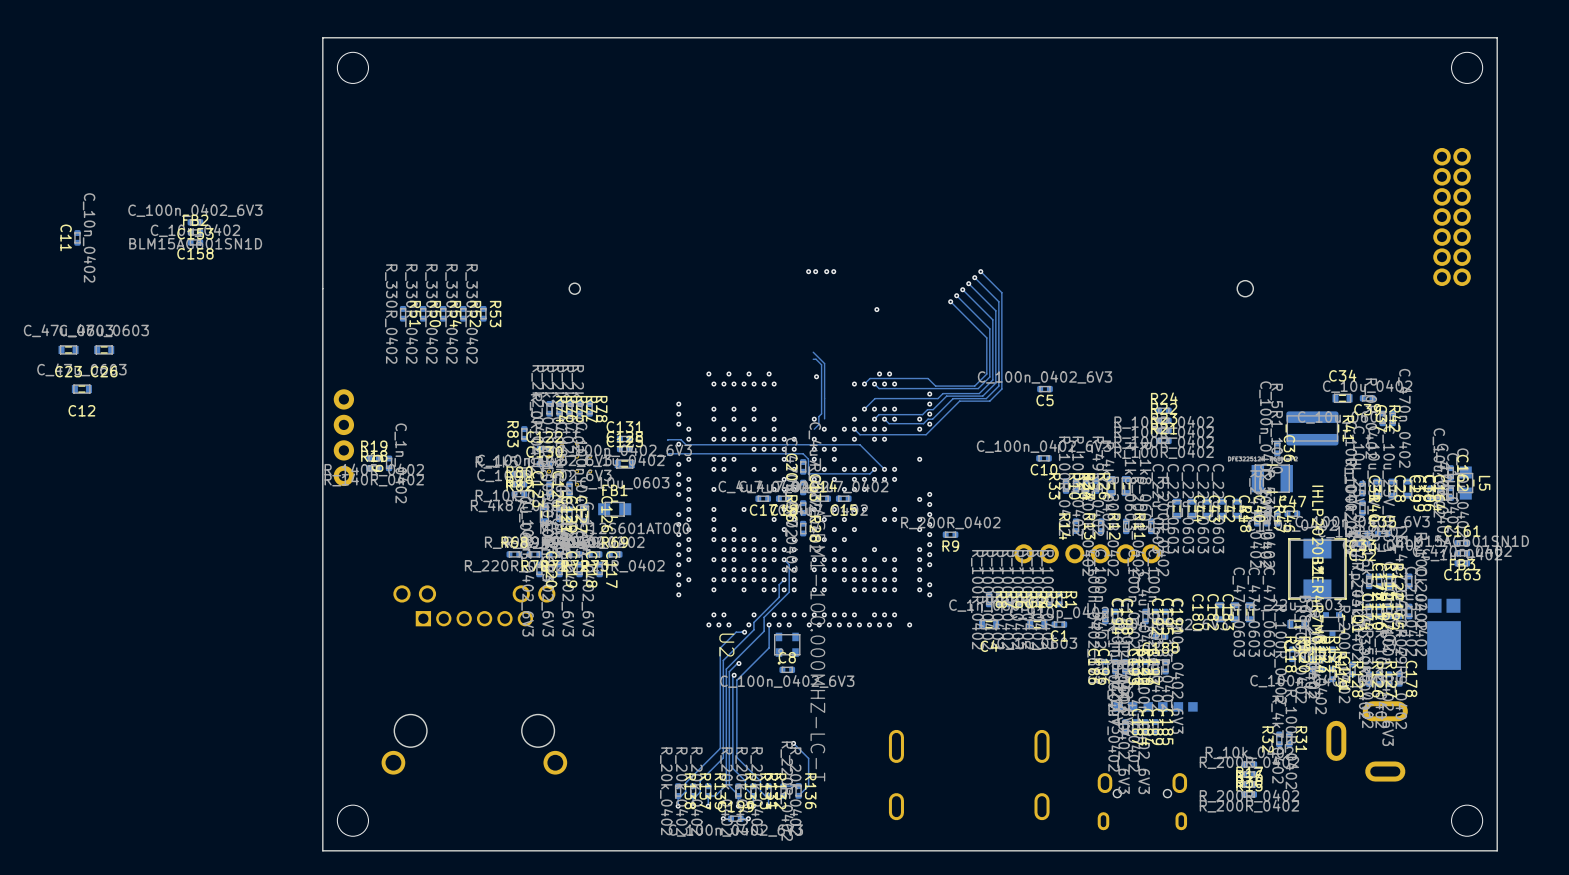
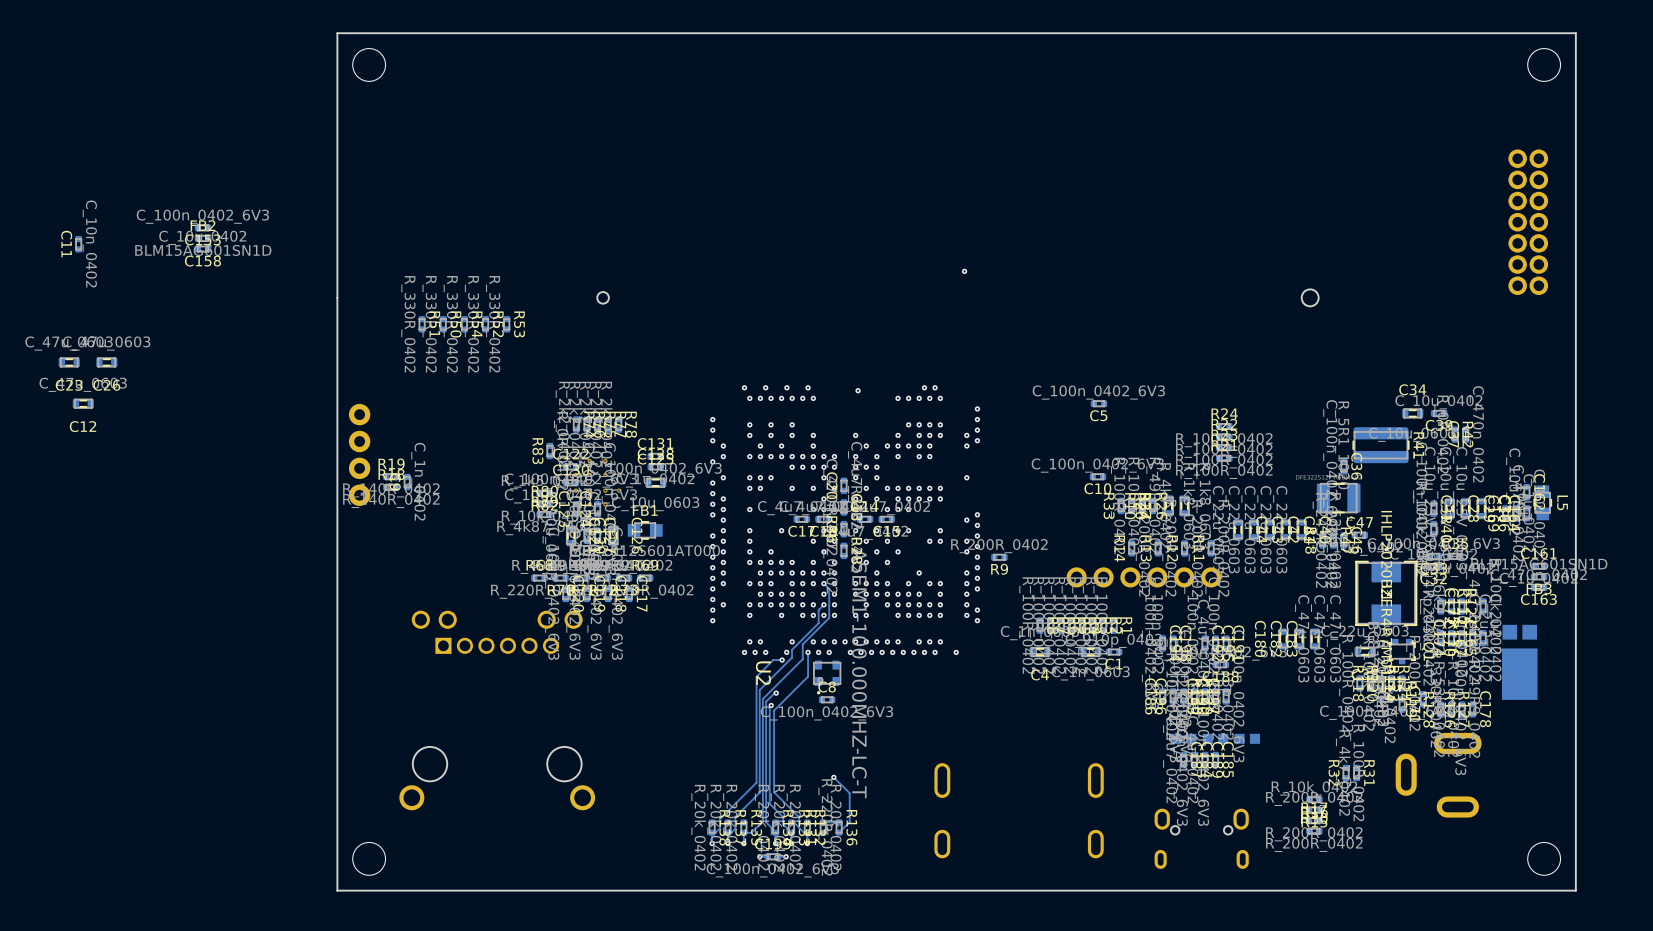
via: none -> (964, 271)
via: (808, 271) -> none
via: (815, 271) -> none
via: (826, 271) -> none
via: (833, 271) -> none
track: (980, 271) (1001, 292) (1001, 389) (989, 401) (959, 401) (926, 434) (859, 434) (854, 429) -> none
via: (980, 271) -> none
track: (974, 277) (998, 301) (998, 386) (986, 398) (953, 398) (932, 419) (928, 419) (923, 423) (889, 423) (884, 419) -> none
via: (974, 277) -> none
track: (968, 283) (995, 310) (995, 383) (982, 396) (946, 396) (933, 409) (927, 409) (922, 414) (879, 414) (874, 419) -> none
via: (968, 283) -> none
track: (962, 289) (992, 319) (992, 380) (979, 393) (942, 393) (937, 398) (875, 398) (864, 409) -> none
via: (962, 289) -> none
track: (956, 295) (989, 328) (989, 377) (978, 388) (879, 388) (874, 384) -> none
via: (956, 295) -> none
track: (950, 301) (986, 337) (986, 374) (974, 386) (935, 386) (928, 378) (870, 378) (864, 384) -> none
via: (950, 301) -> none
via: (876, 309) -> none
track: (813, 352) (824, 363) (824, 418) -> none
track: (813, 359) (816, 359) (821, 364) (821, 413) (818, 416) (818, 424) (814, 429) -> none
track: (667, 440) (680, 439) (685, 444) (859, 444) (884, 469) -> none
track: (667, 455) (669, 453) (803, 453) (808, 459) (808, 473) (870, 473) (874, 469) -> none

